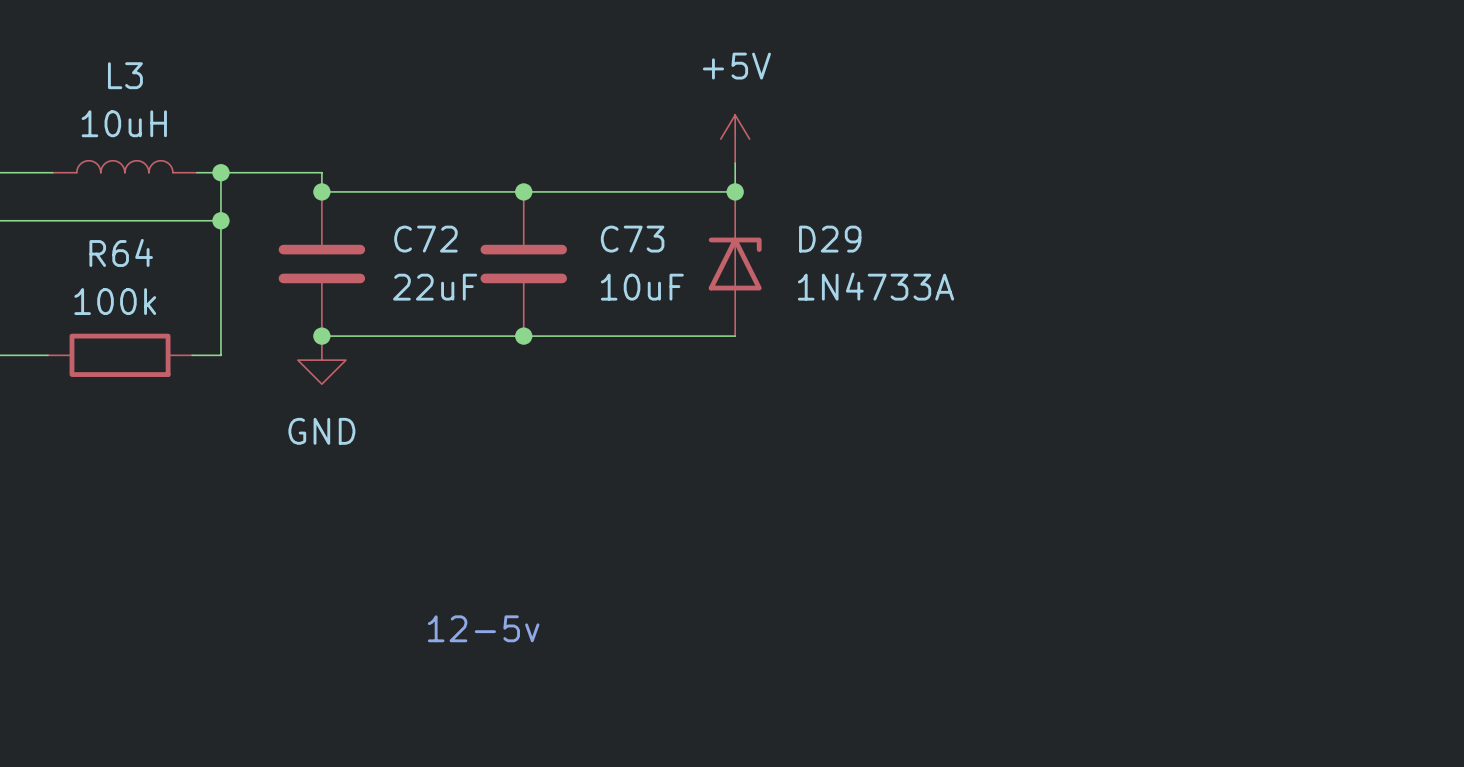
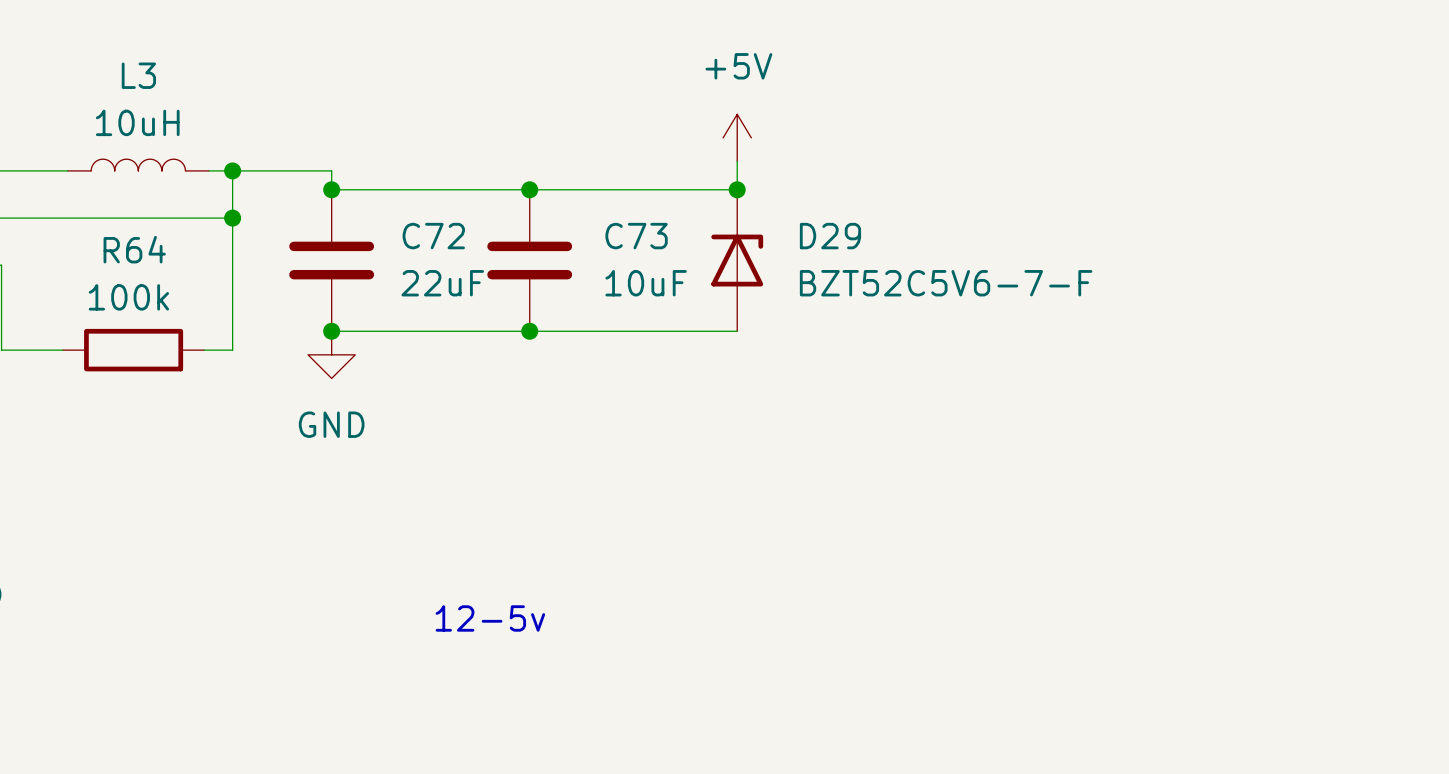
D29 value: 1N4733A (875, 286) -> BZT52C5V6-7-F (946, 283)

